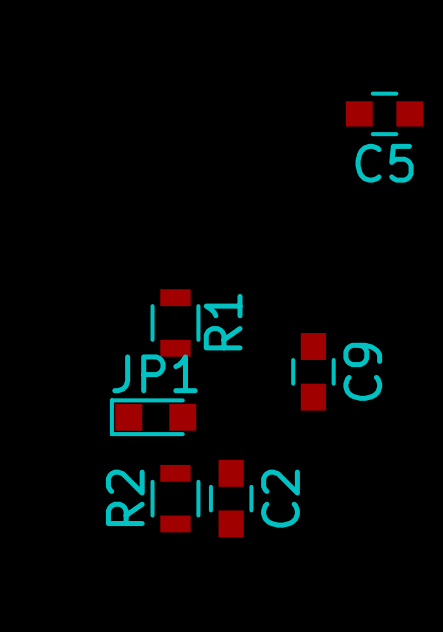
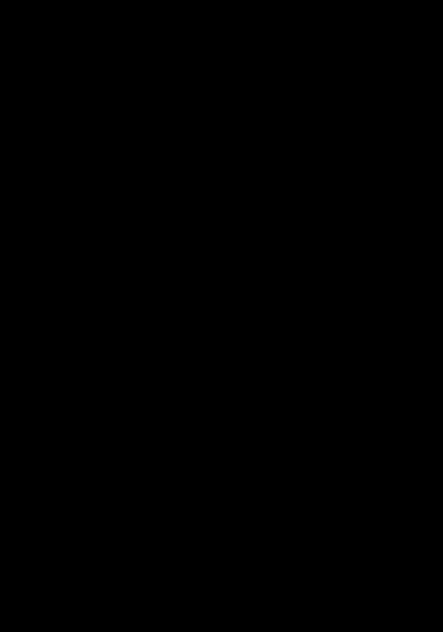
C5: (384, 113) -> none
R1: (175, 322) -> none
C9: (313, 371) -> none
JP1: (153, 417) -> none
R2: (175, 498) -> none
C2: (231, 498) -> none

